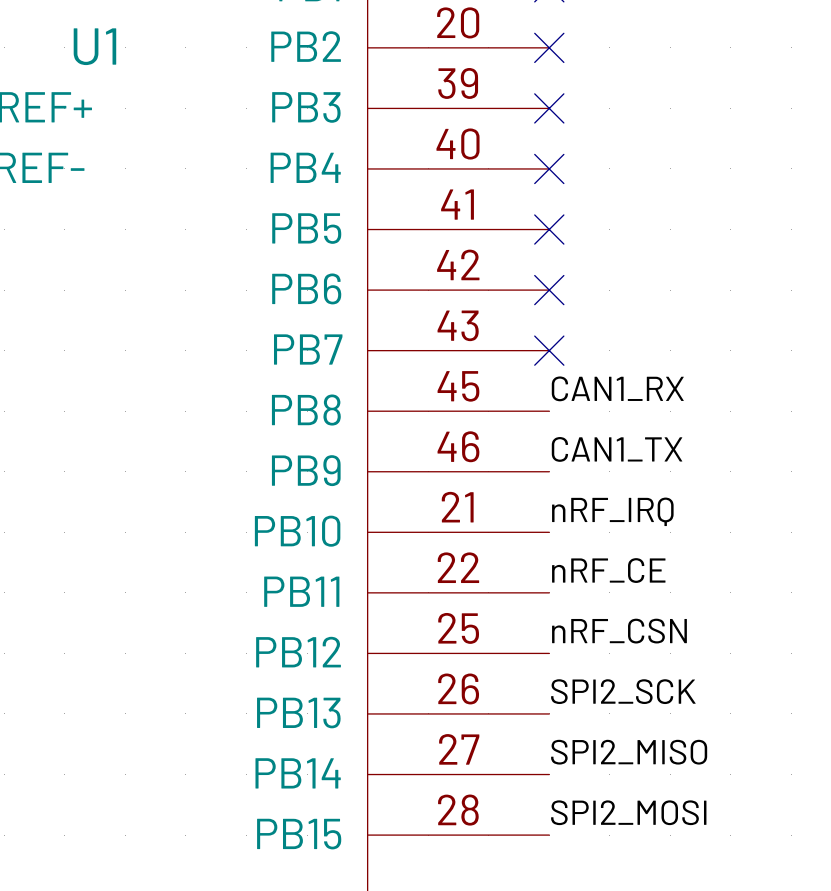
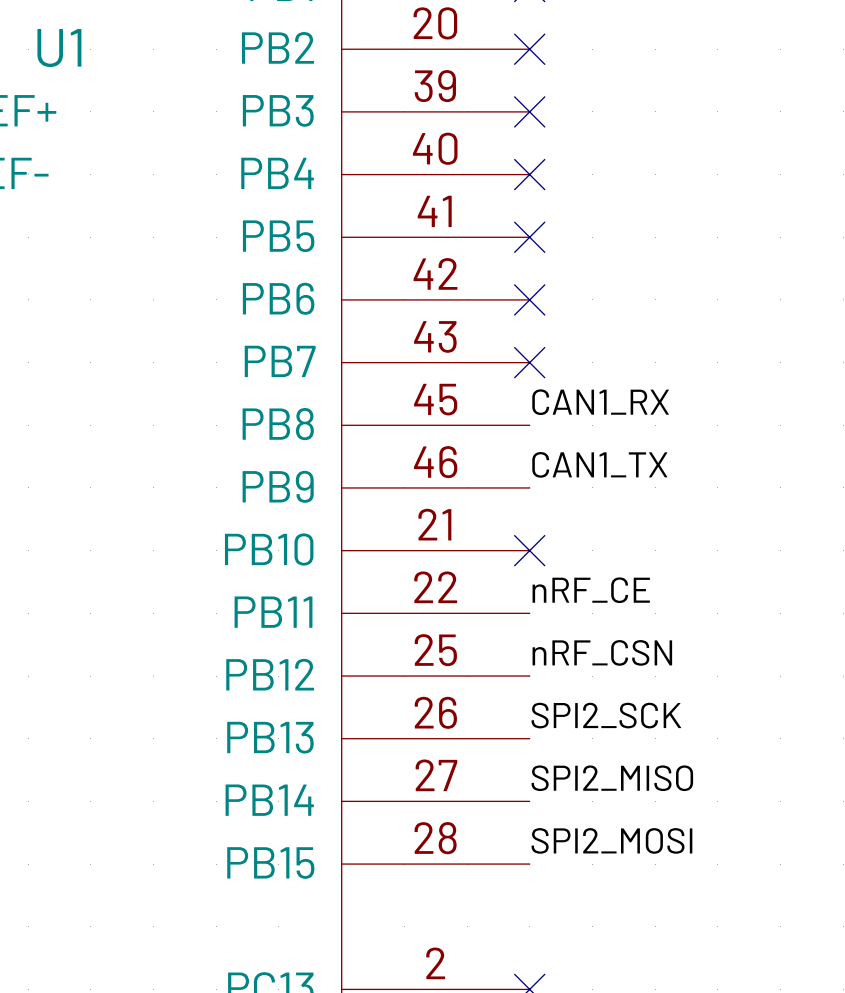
label: nRF_IRQ (612, 511) -> none
no-connect mark: none -> (529, 550)

